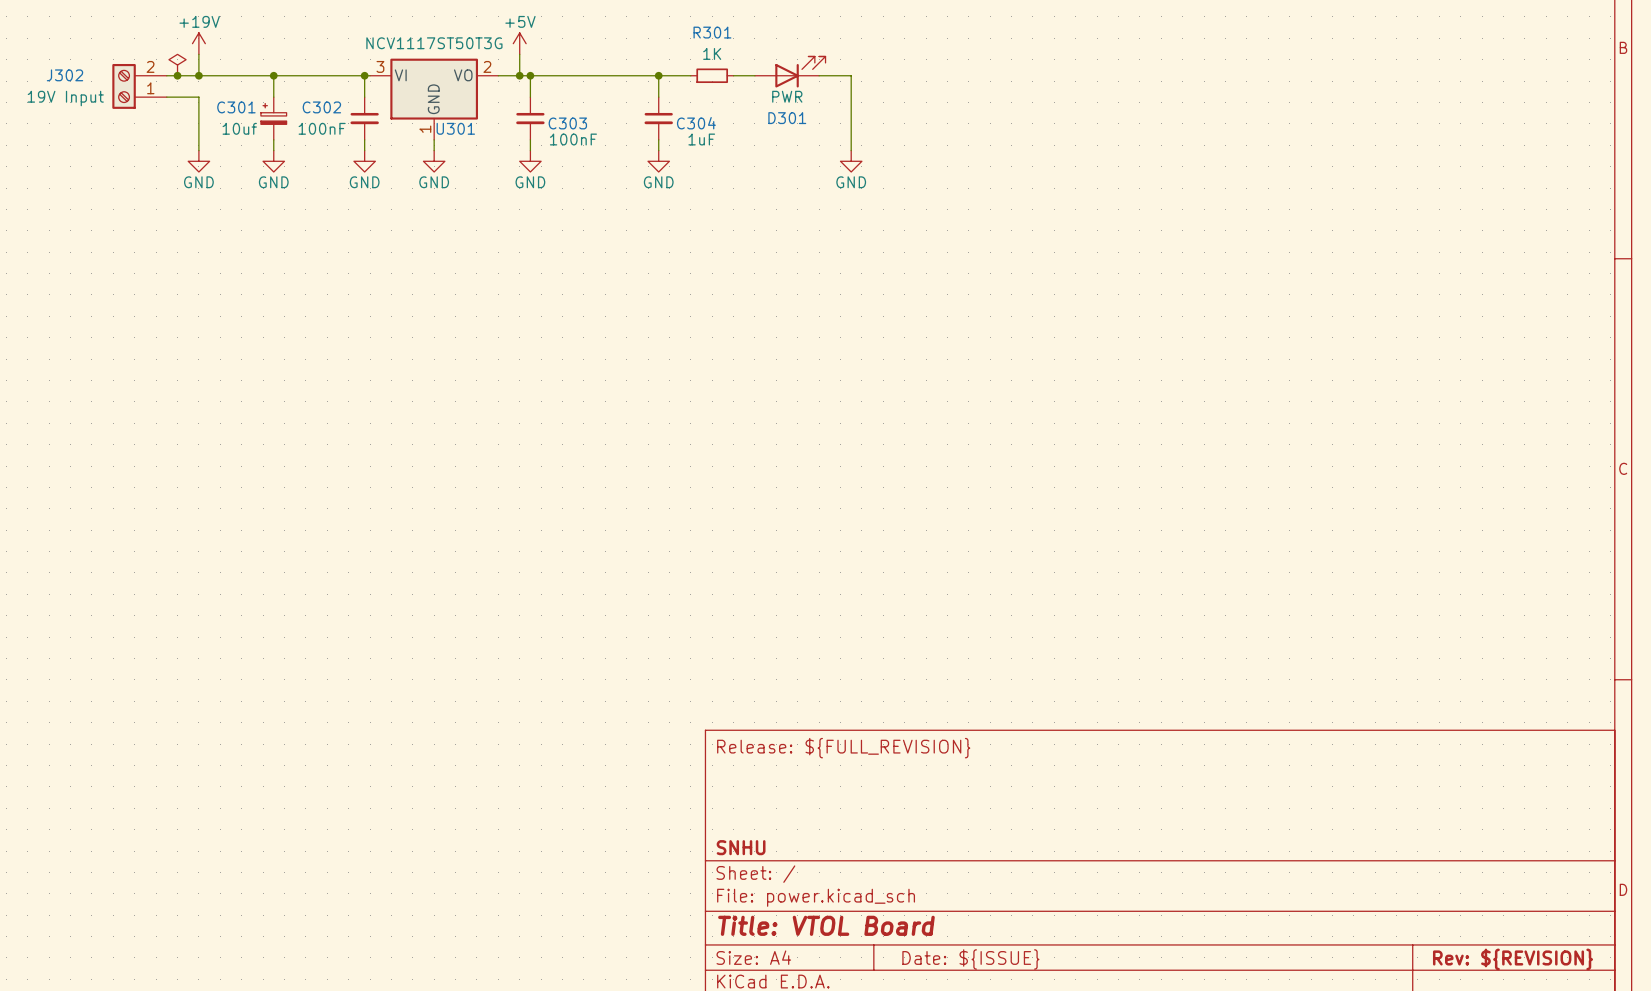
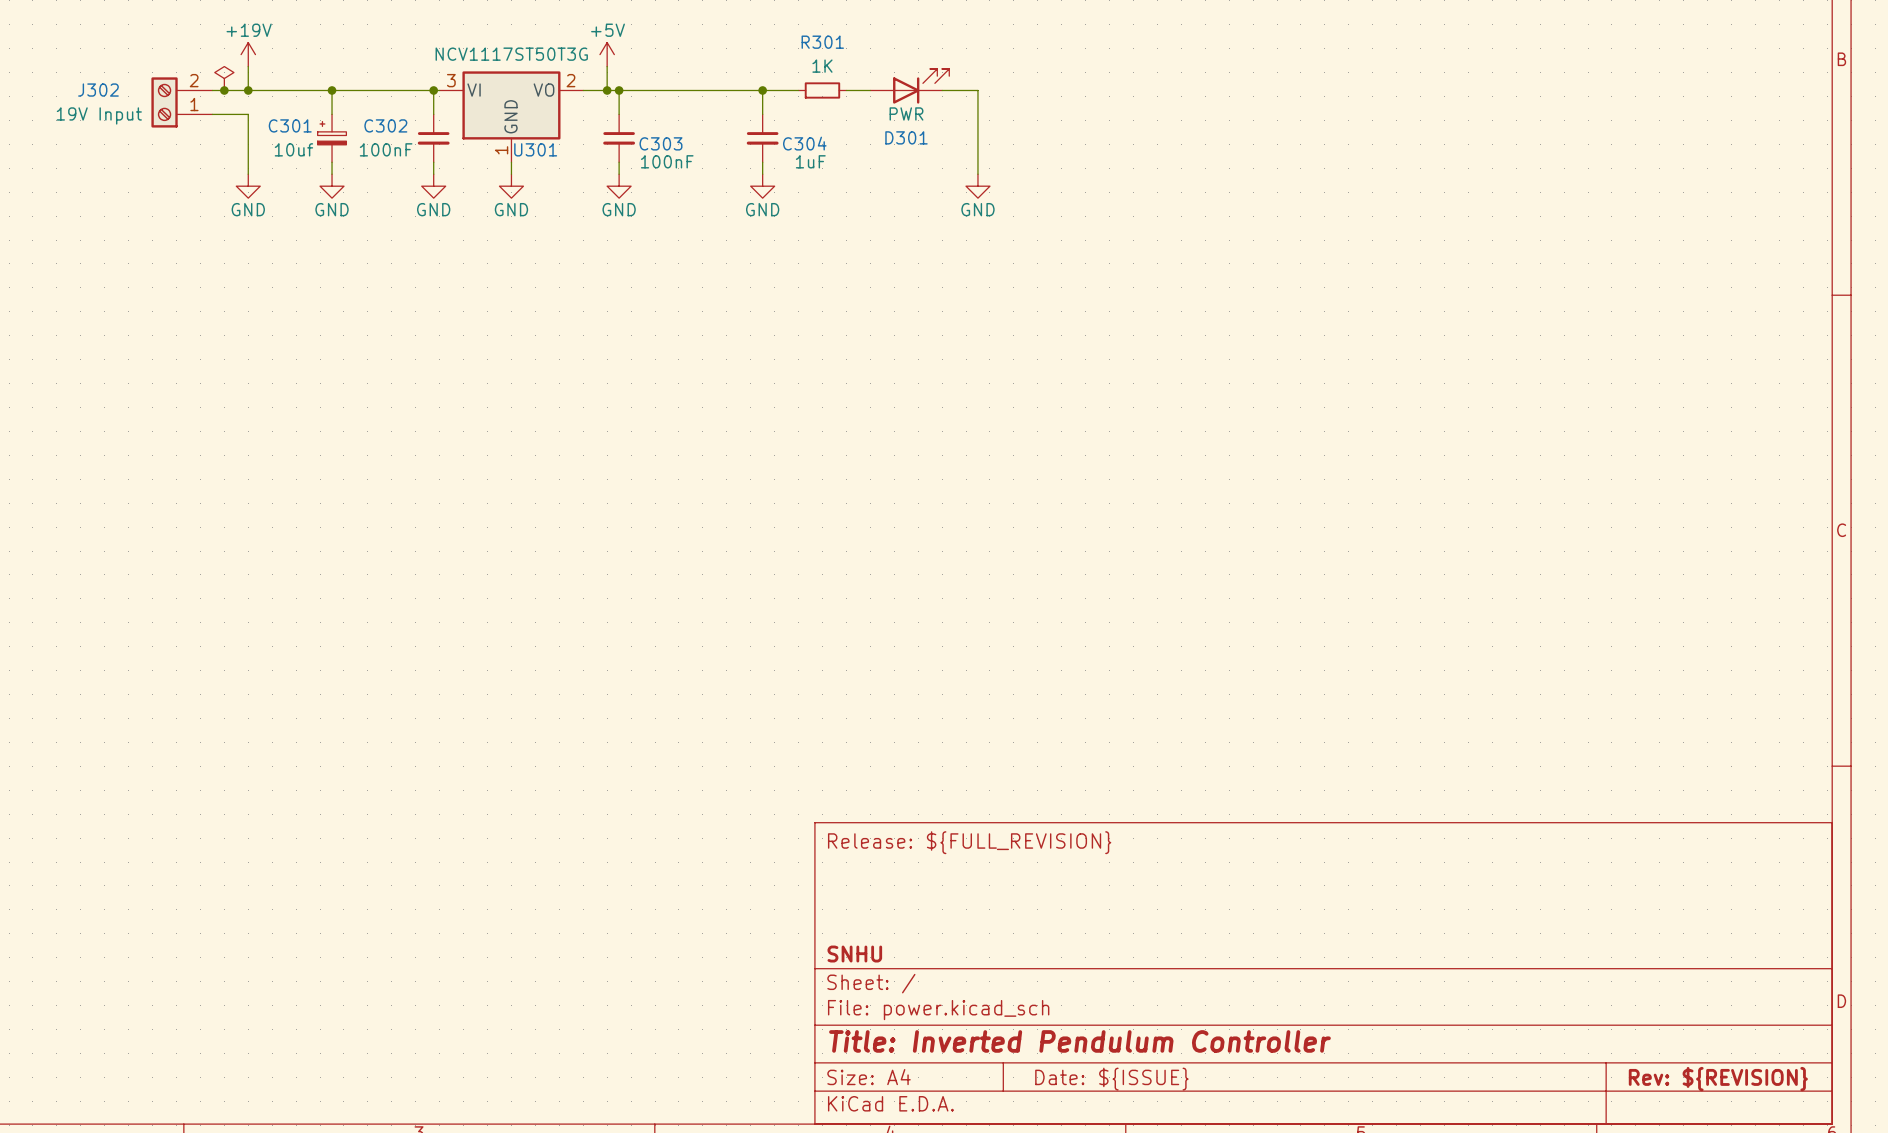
title block: Title: VTOL Board (826, 925) -> Title: Inverted Pendulum Controller (1079, 1041)

